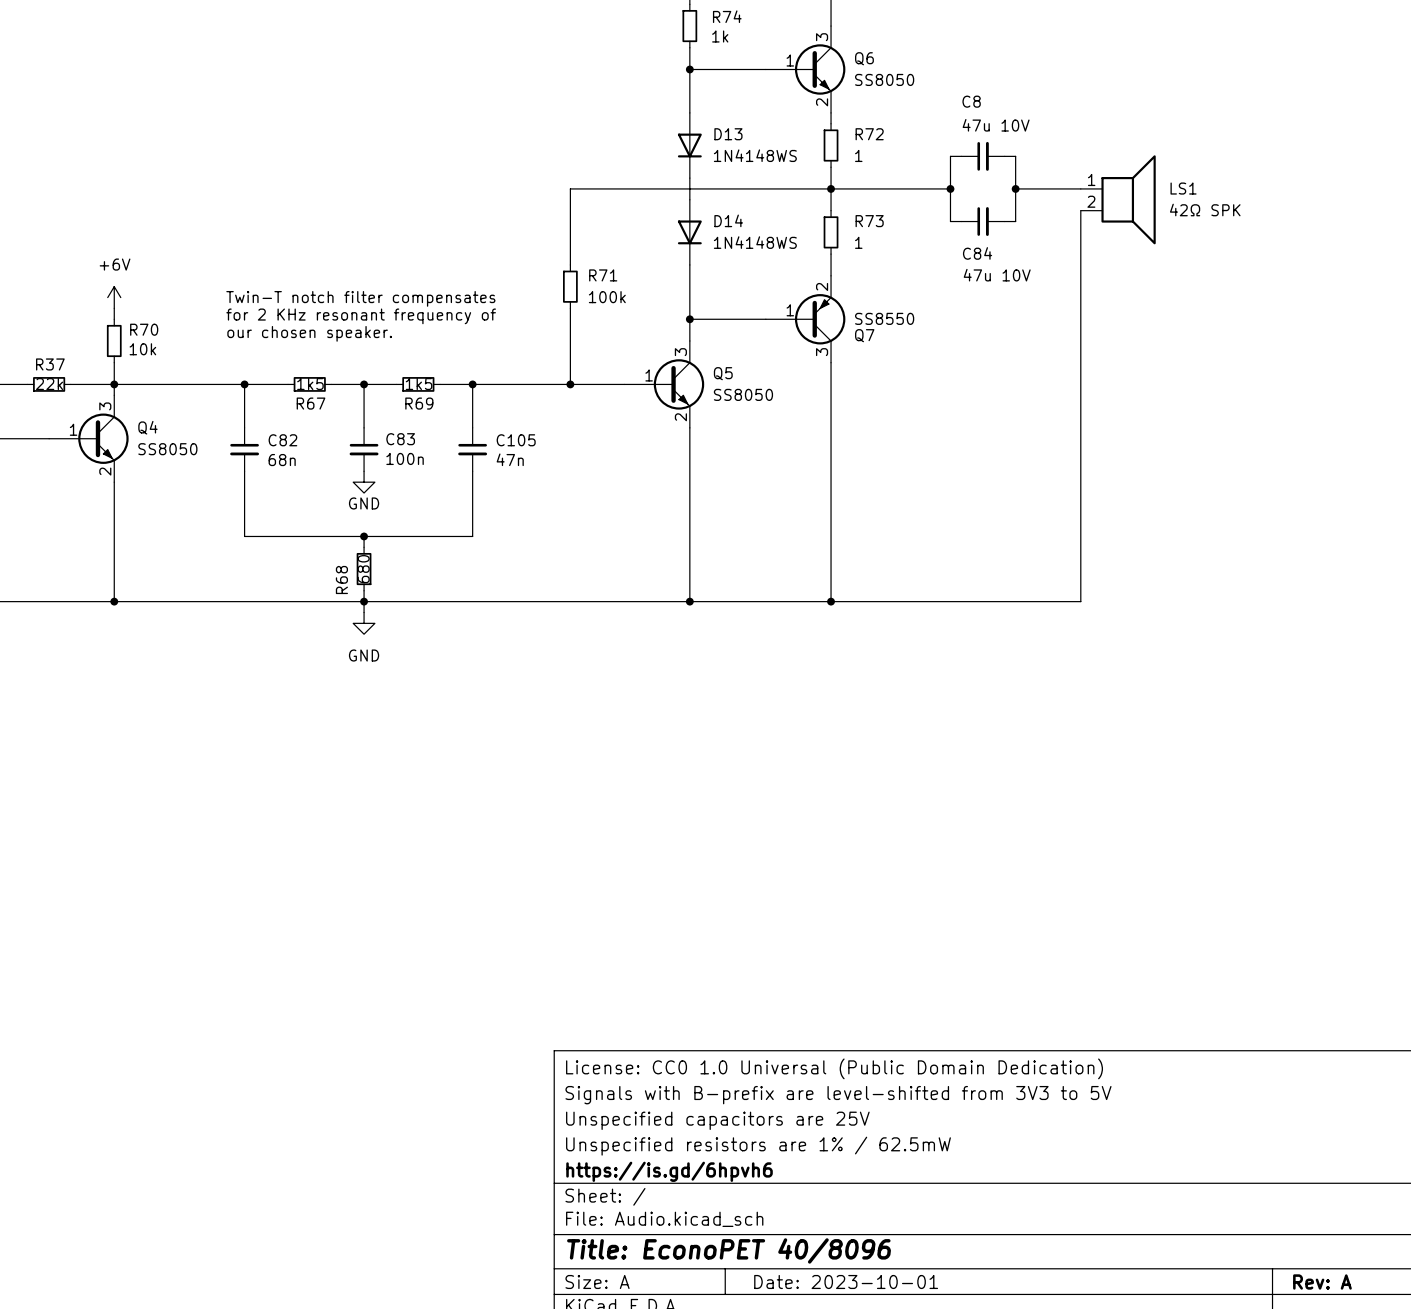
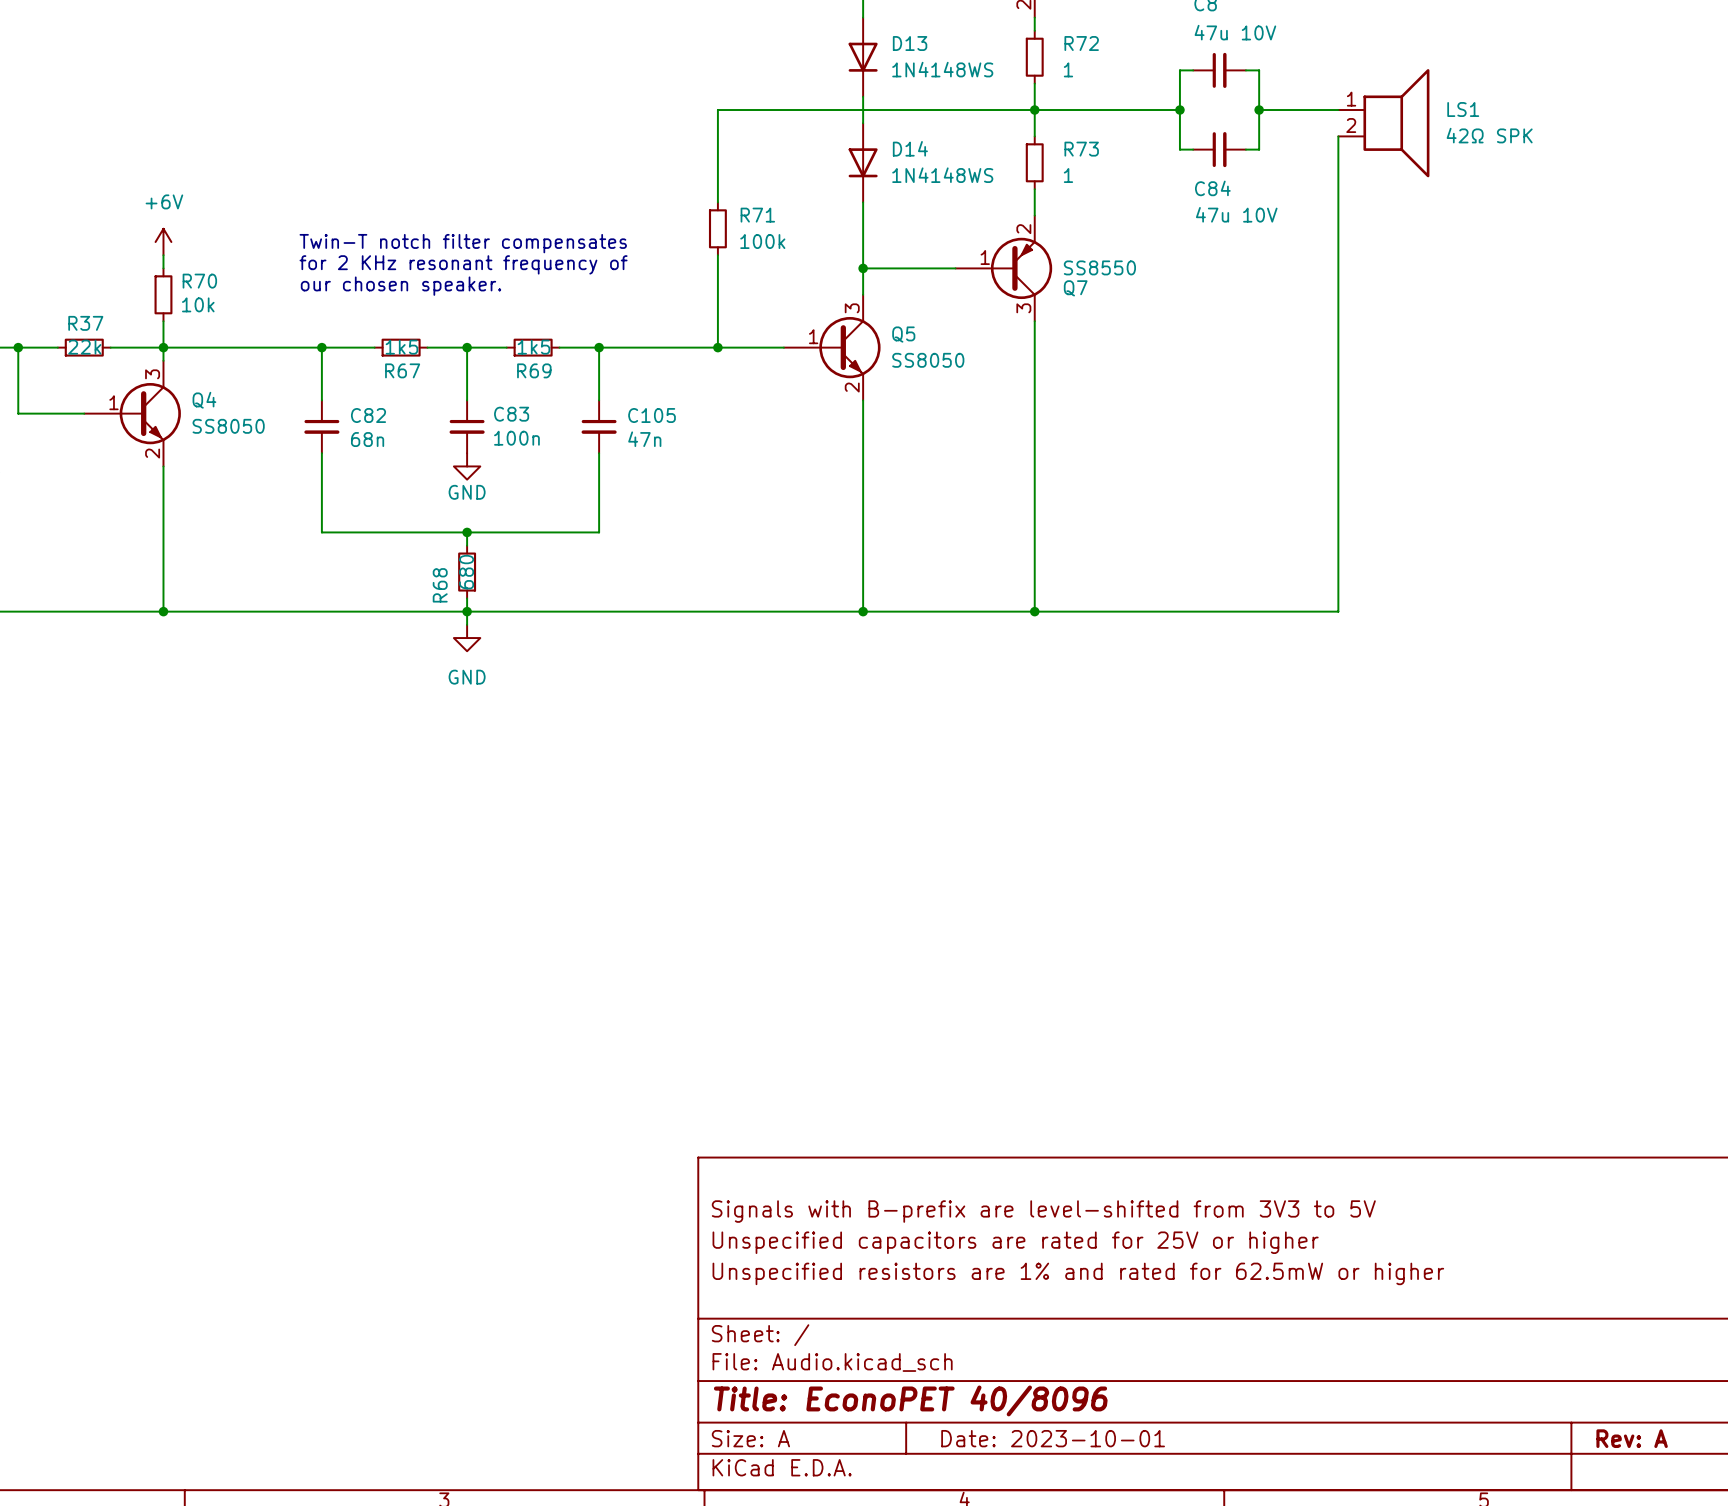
title block: License: CC0 1.0 Universal (Public Domain Dedication) (834, 1068) -> none
title block: Unspecified capacitors are 25V (717, 1120) -> Unspecified capacitors are rated for 25V or higher (1015, 1242)
title block: Unspecified resistors are 1% / 62.5mW (758, 1146) -> Unspecified resistors are 1% and rated for 62.5mW or higher (1078, 1273)
title block: https://is.gd/6hpvh6 (669, 1171) -> none

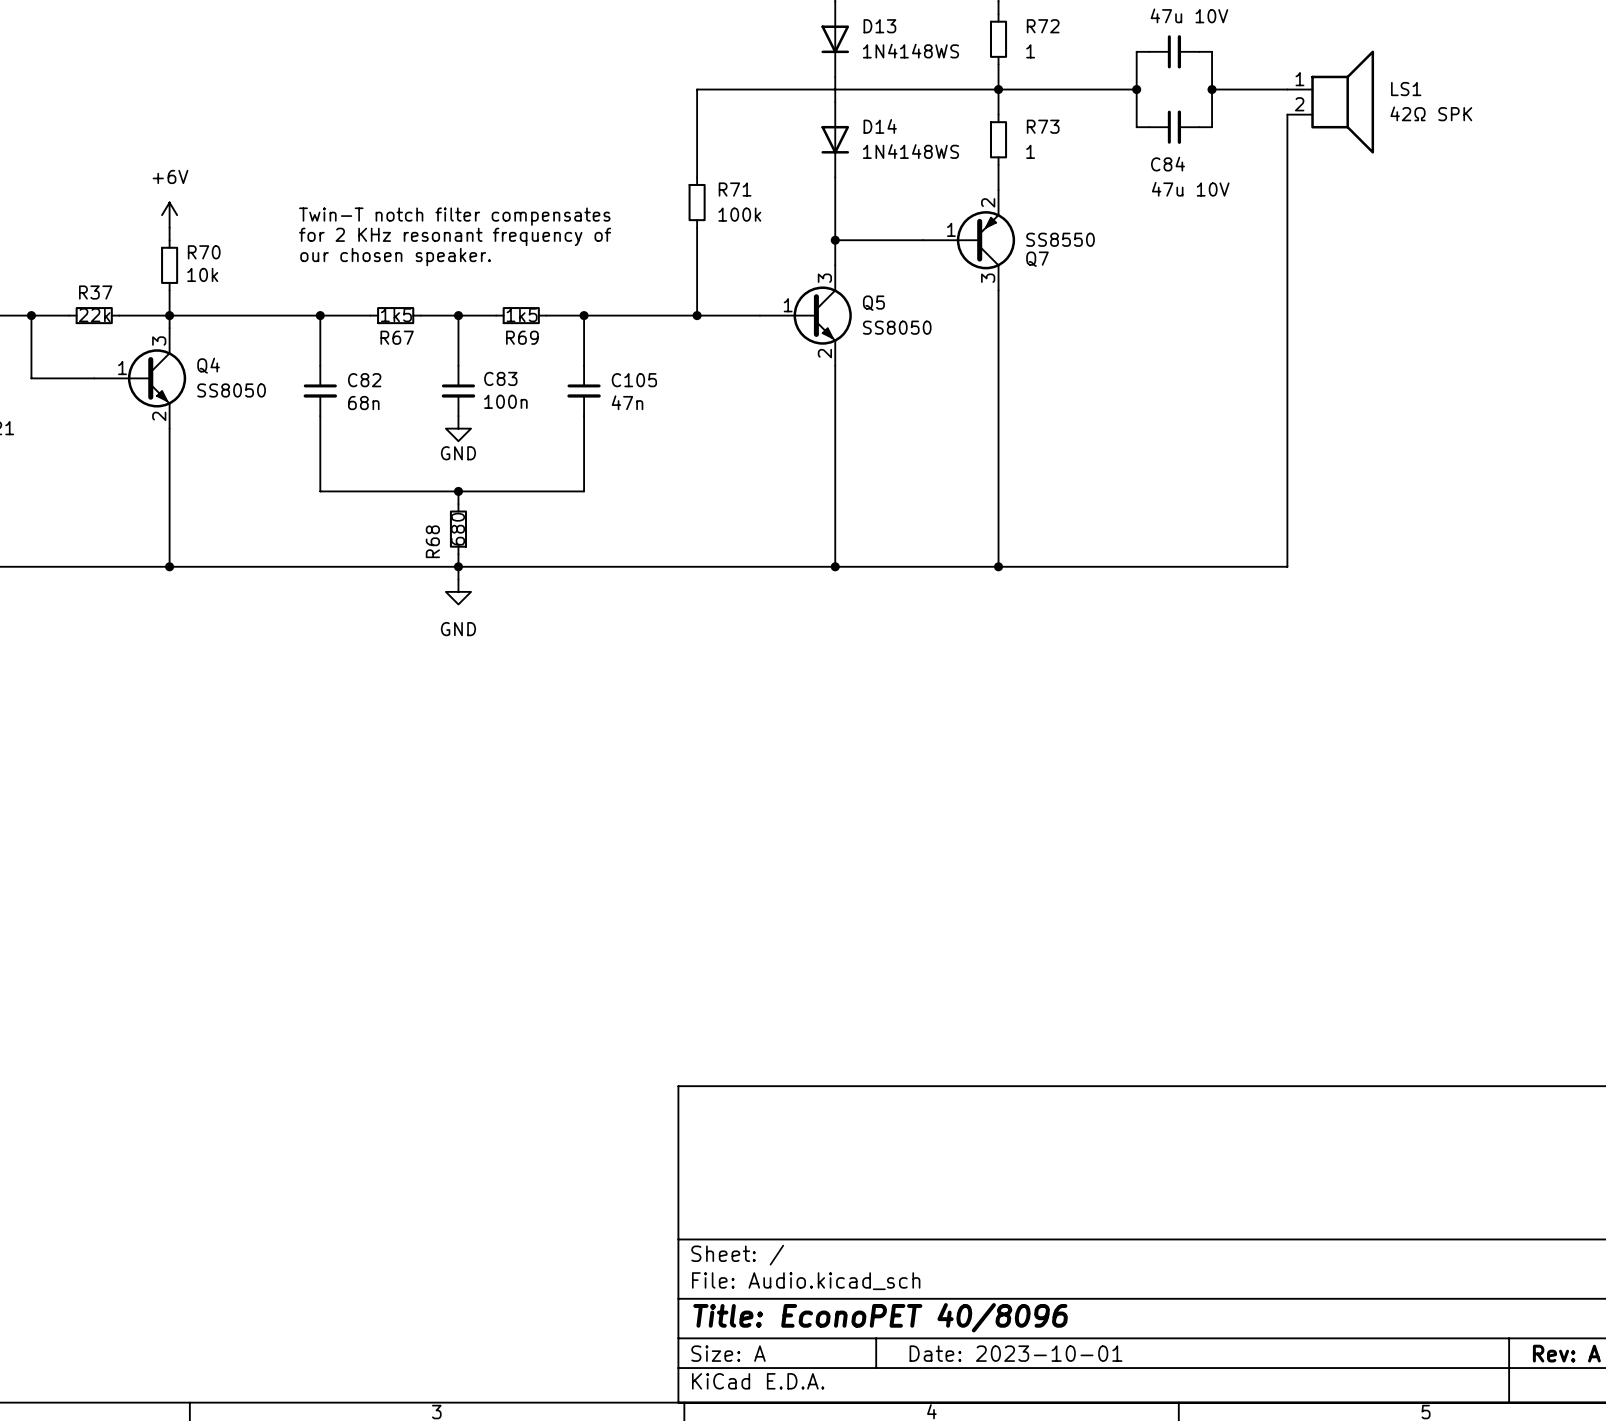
title block: Signals with B-prefix are level-shifted from 3V3 to 5V (1043, 1211) -> none
title block: Unspecified capacitors are rated for 25V or higher (1015, 1242) -> none
title block: Unspecified resistors are 1% and rated for 62.5mW or higher (1078, 1273) -> none

